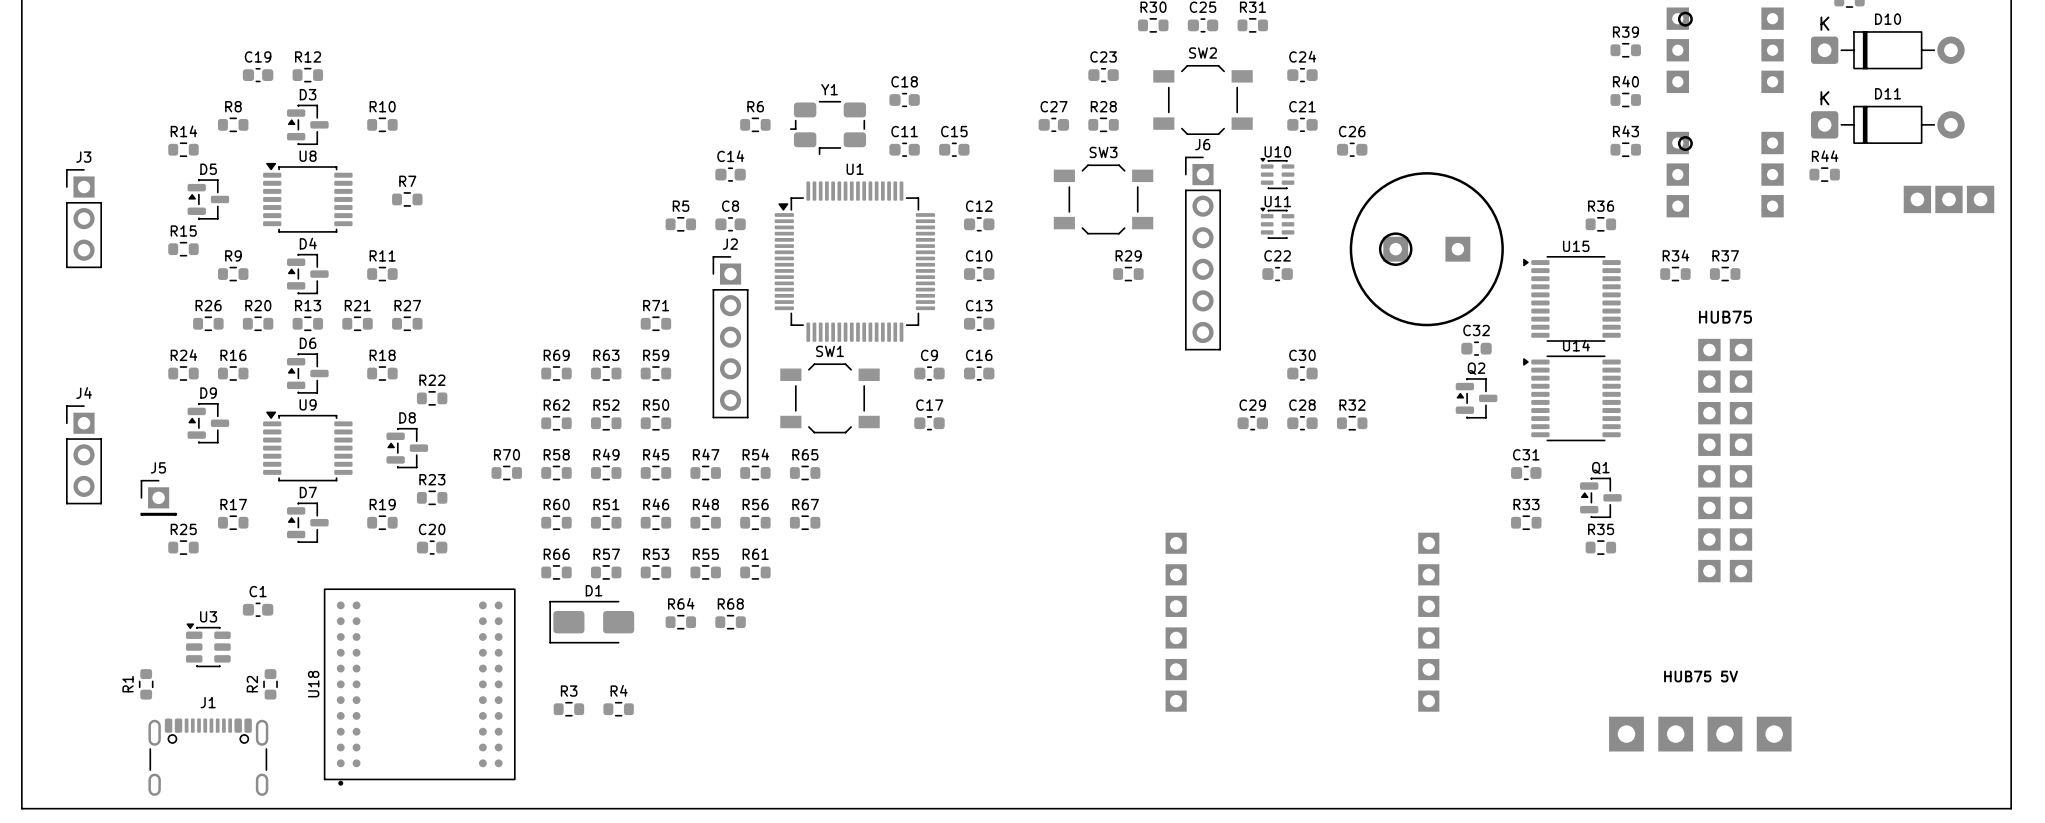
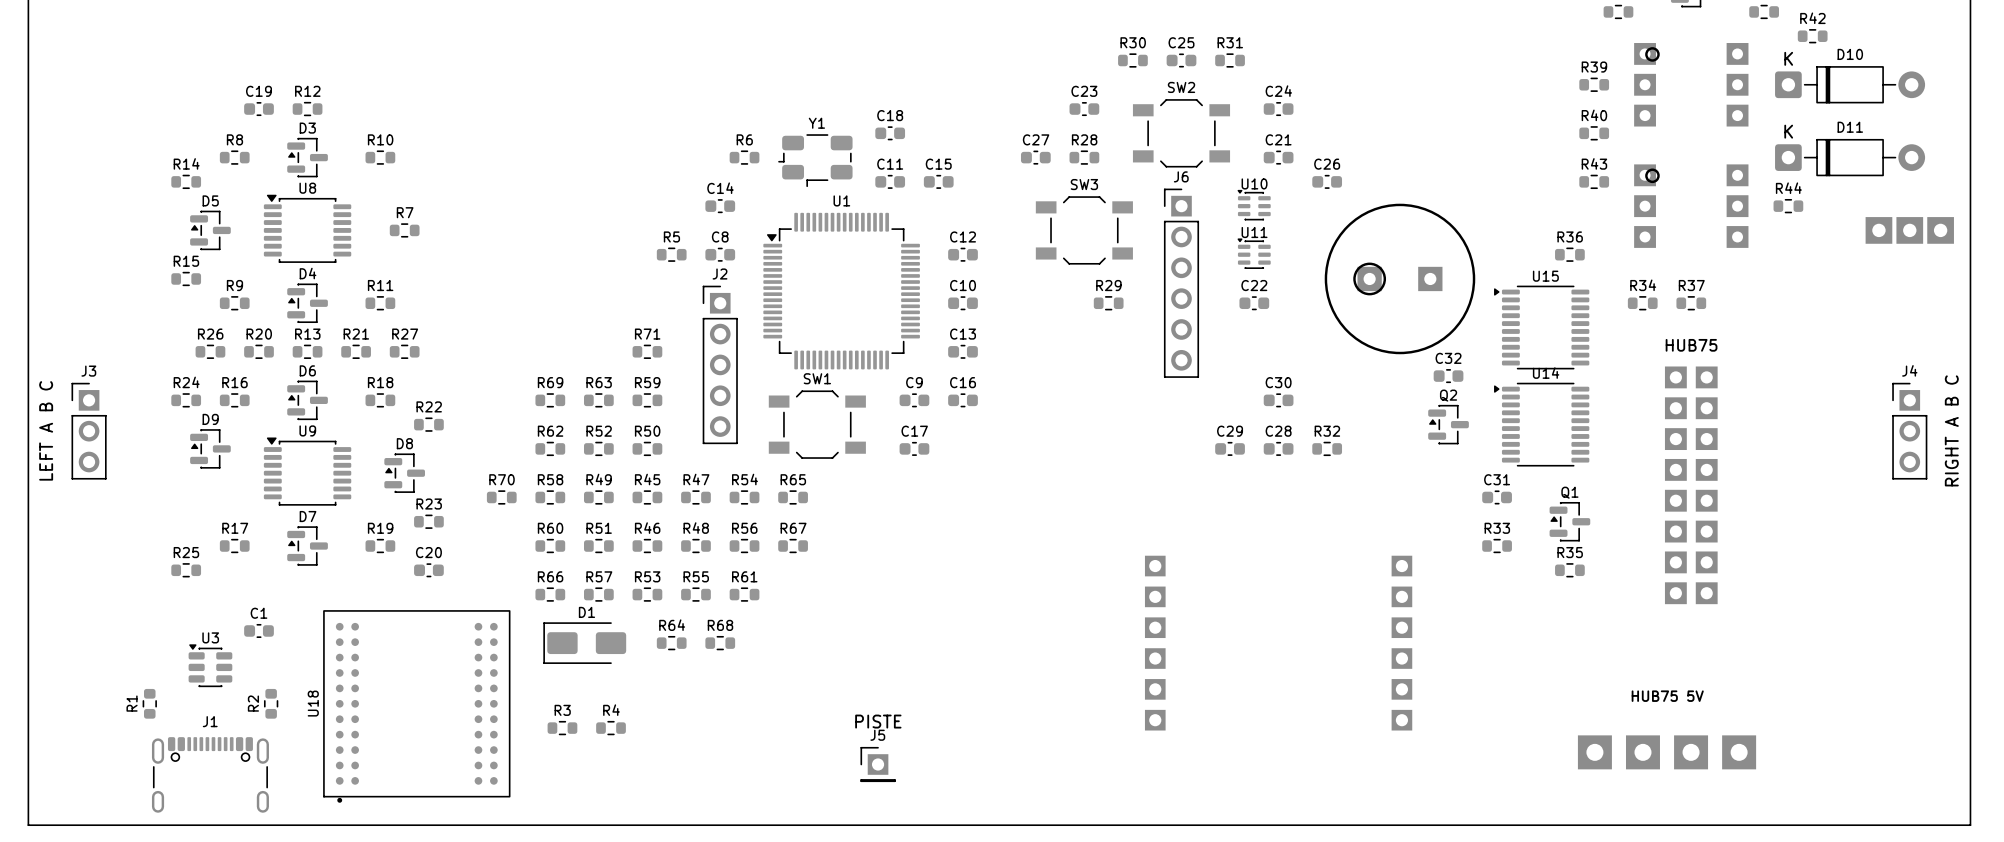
J3 position: (84, 218) -> (89, 431)
text: none -> LEFT A B C (46, 430)
text: none -> RIGHT A B C (1951, 430)
J4 position: (84, 454) -> (1909, 431)
J5 position: (158, 497) -> (878, 764)
text: none -> PISTE (878, 721)

